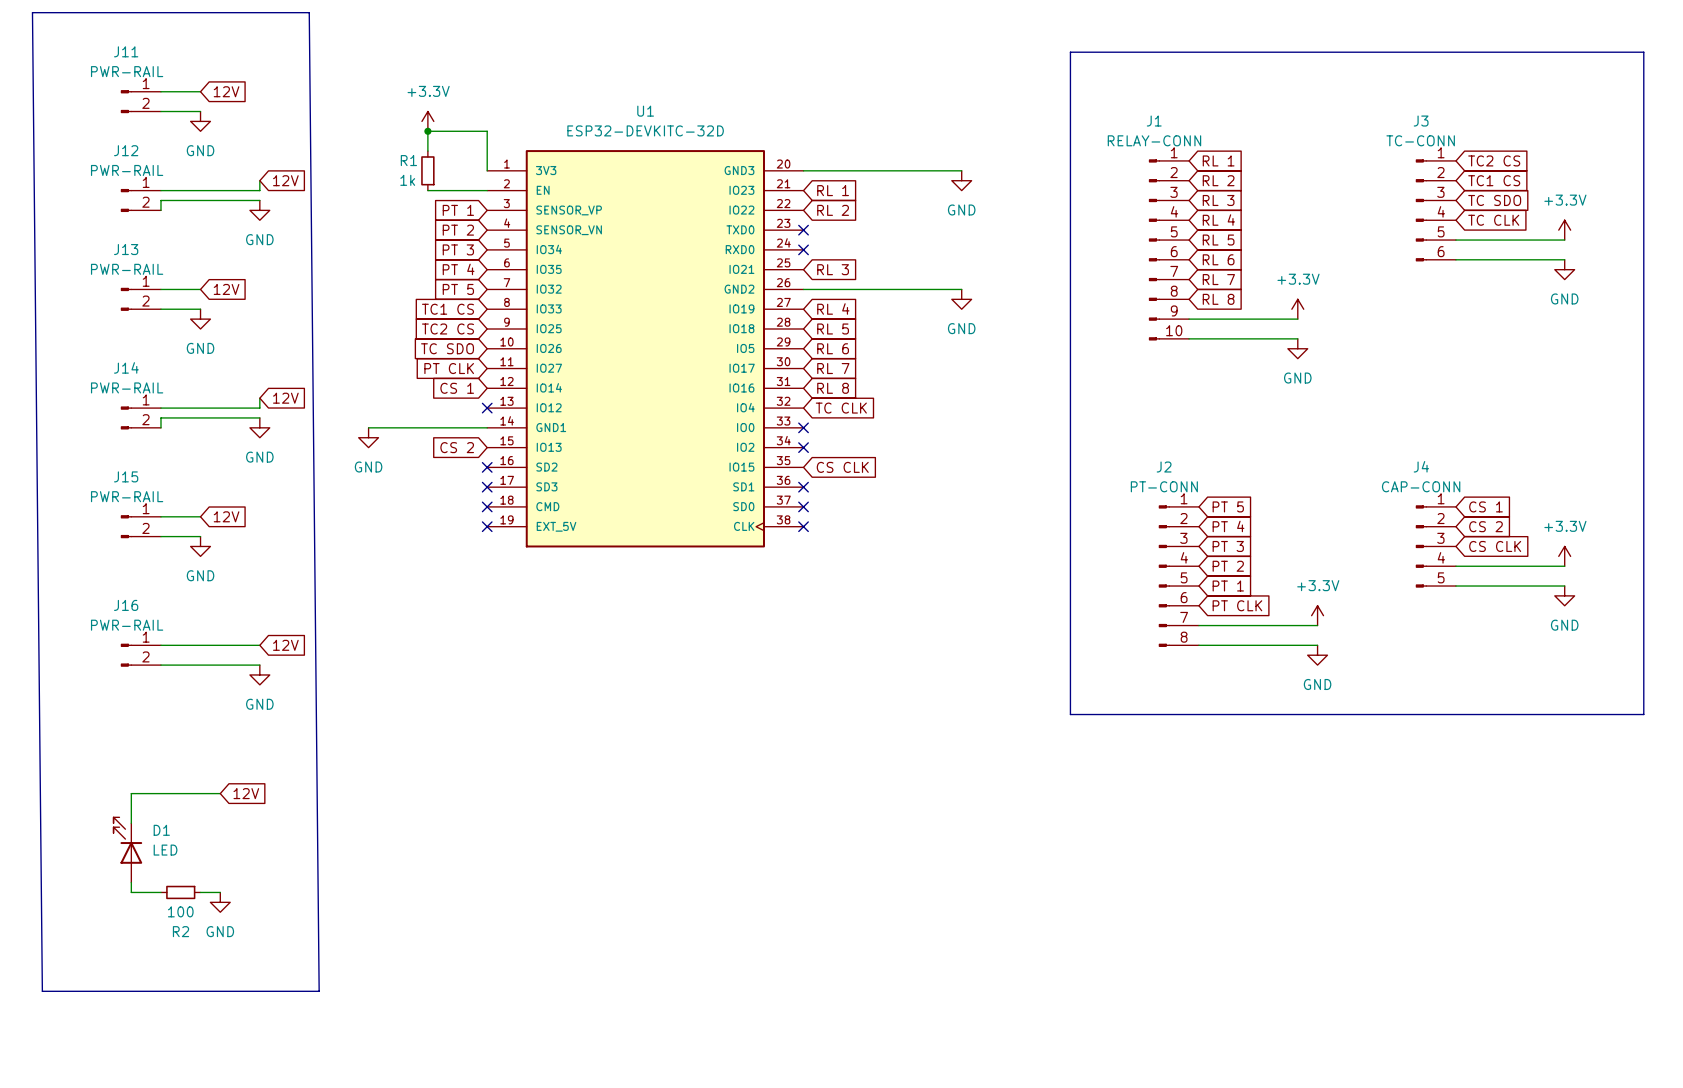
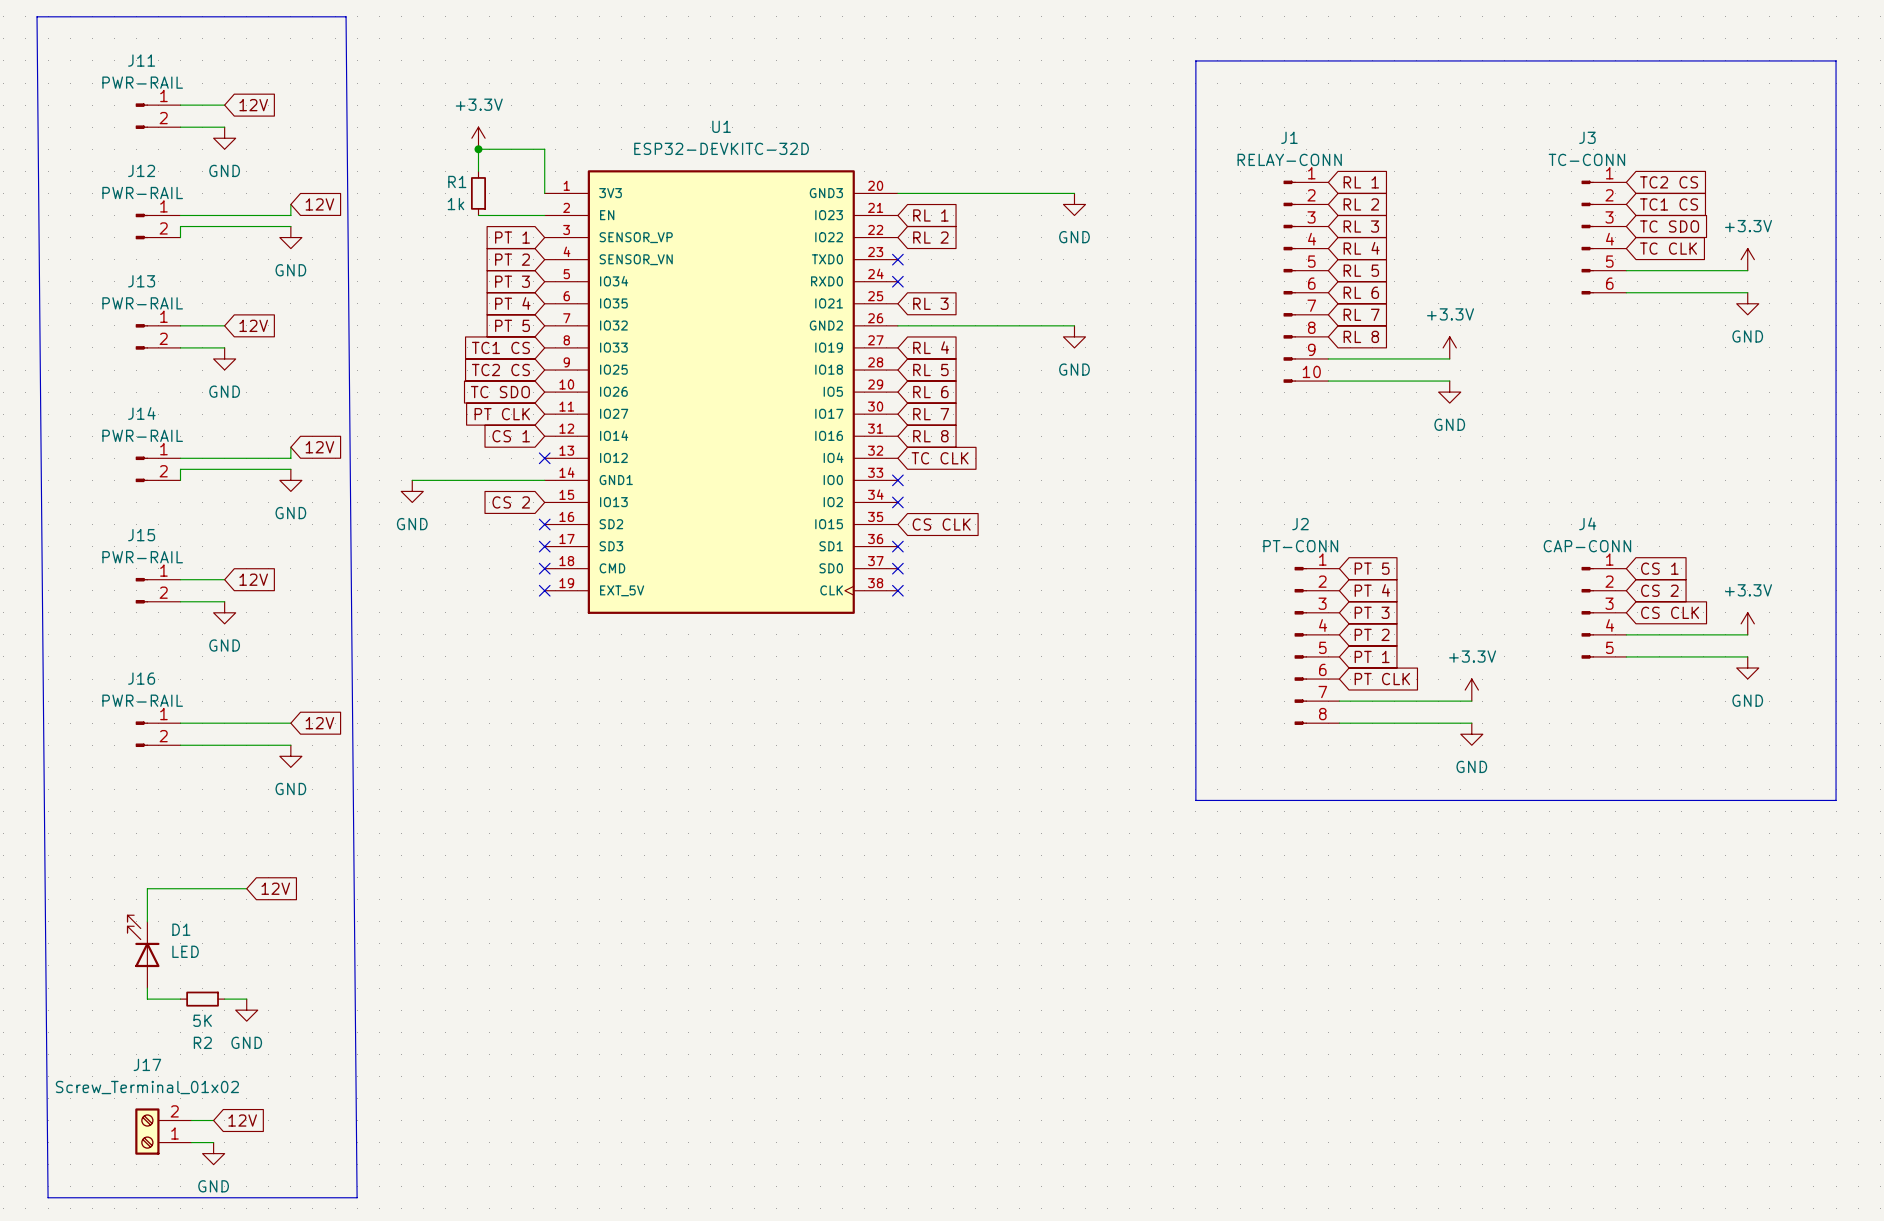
line: (32, 12) (42, 991) (319, 991) (309, 12) -> (37, 16) (48, 1197) (357, 1197) (346, 16)
R2 value: 100 (180, 911) -> 5K (202, 1020)
wire: none -> (191, 1120) (213, 1120)
global label: none -> 12V (242, 1120)
J17: none -> Screw_Terminal_01x02 (163, 1131)
wire: none -> (191, 1142) (213, 1142)
power symbol: none -> GND (213, 1153)

